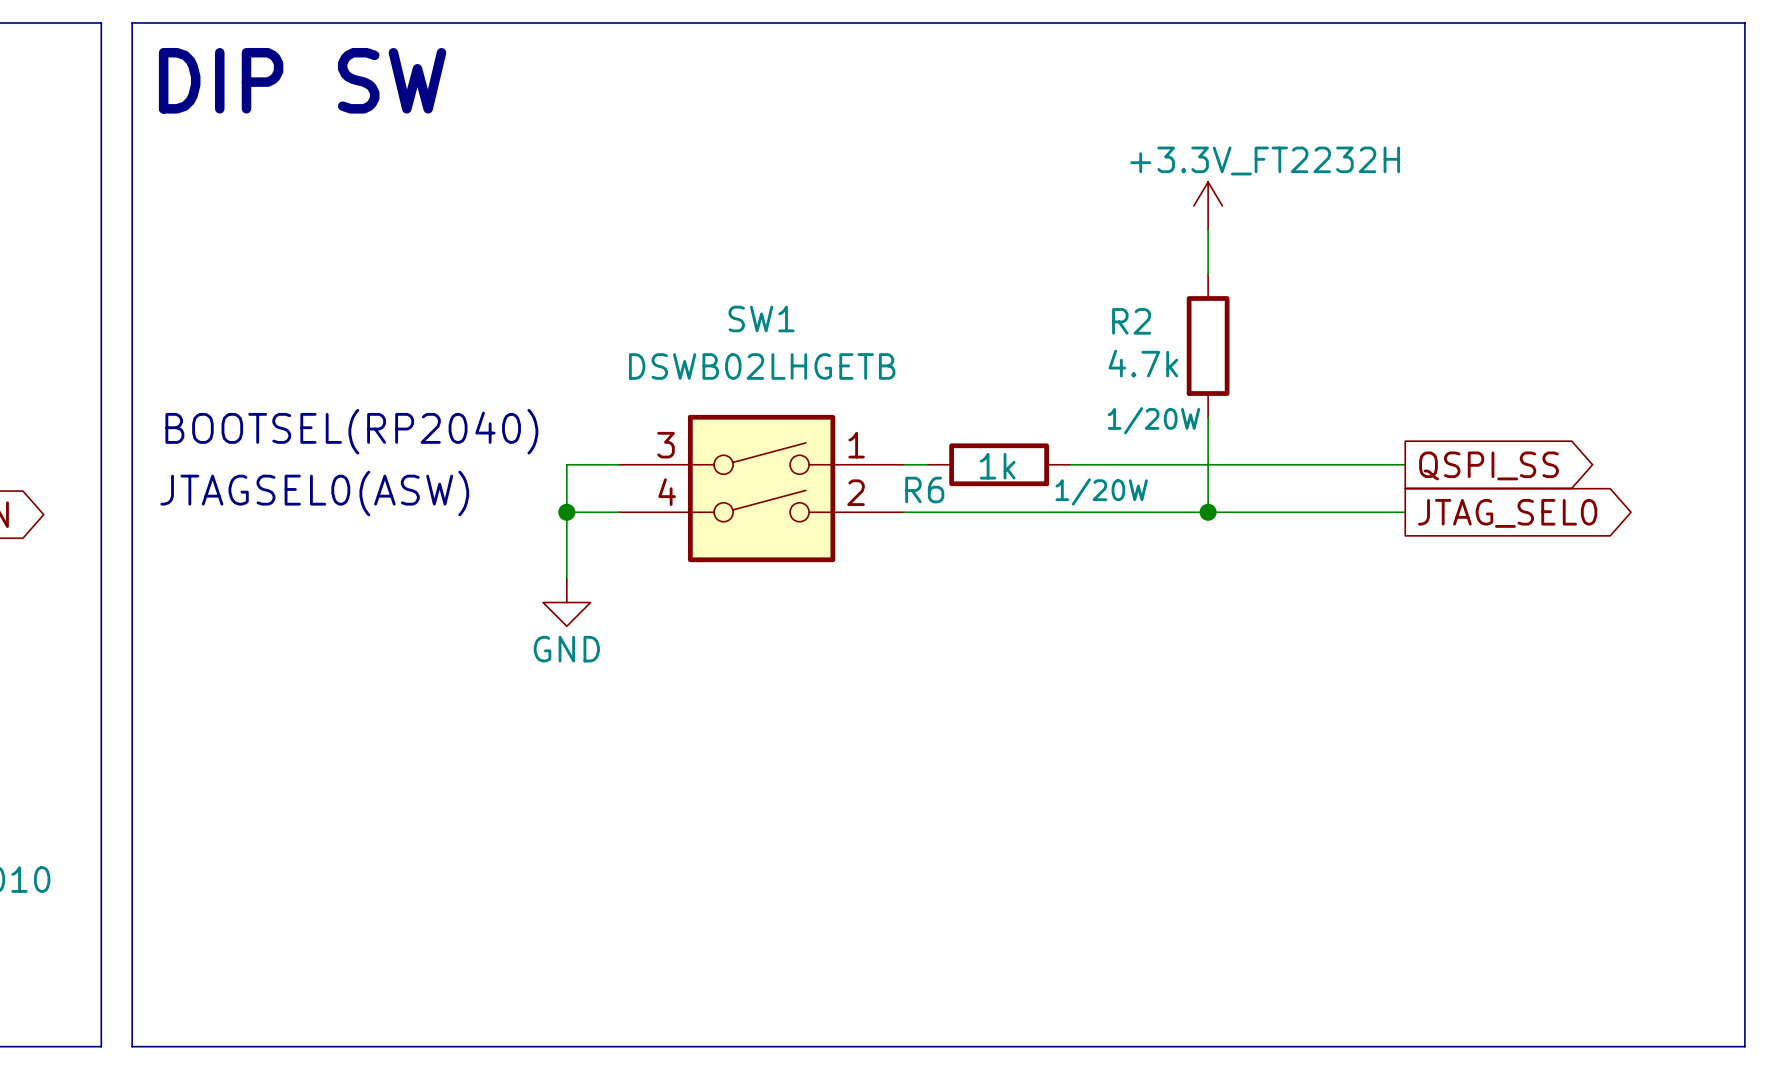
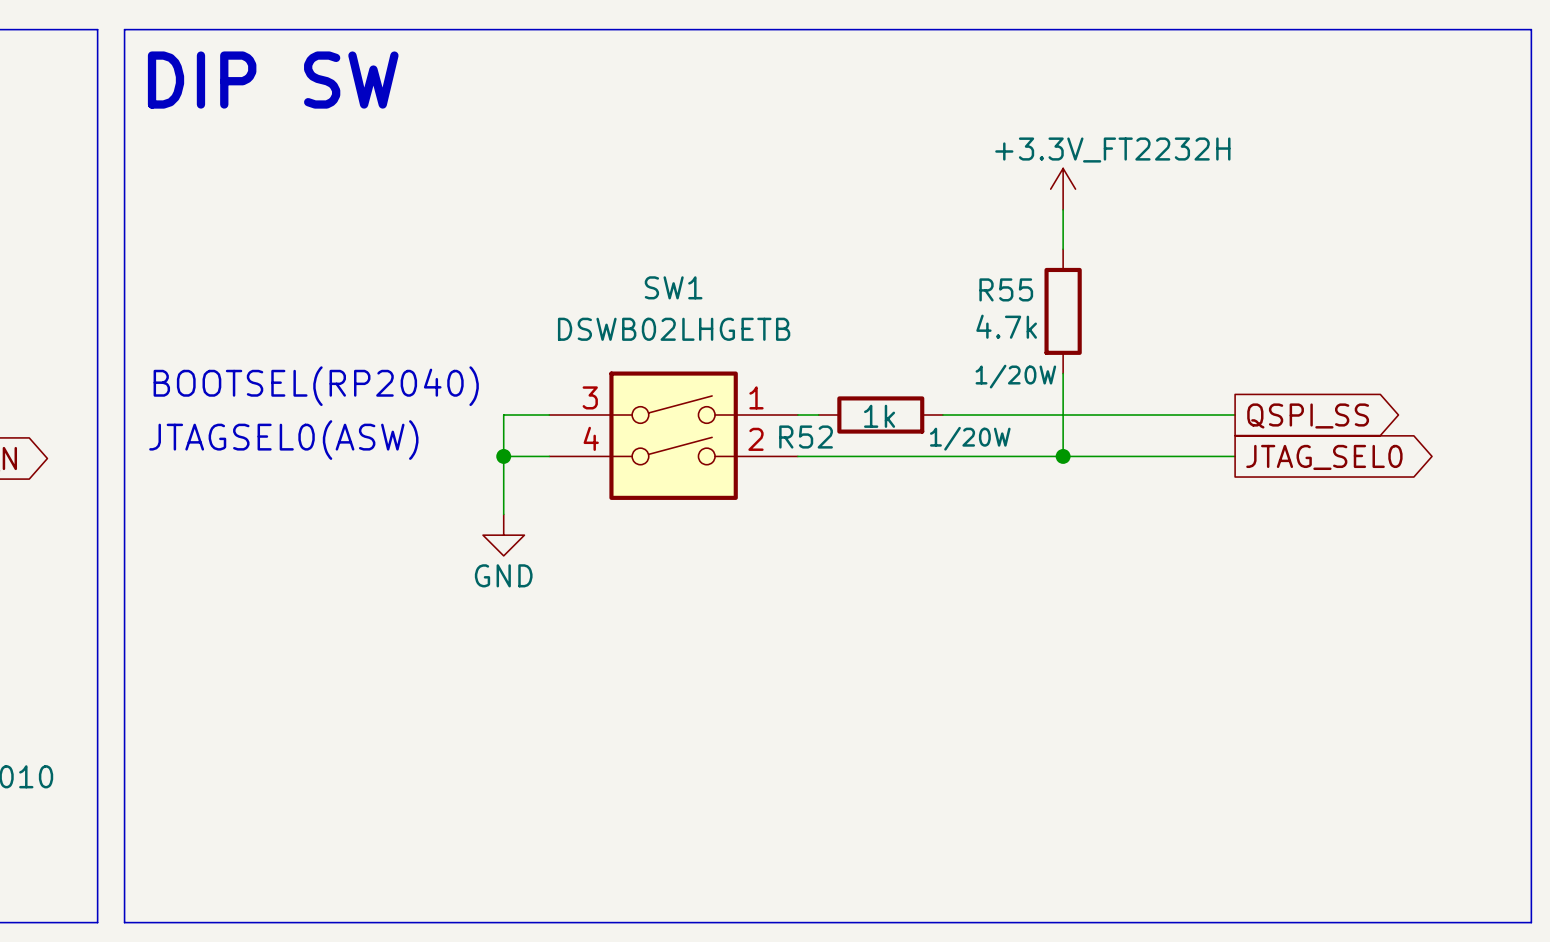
R2 name: R2 (1131, 321) -> R55 (1006, 289)
R6 name: R6 (924, 490) -> R52 (806, 437)

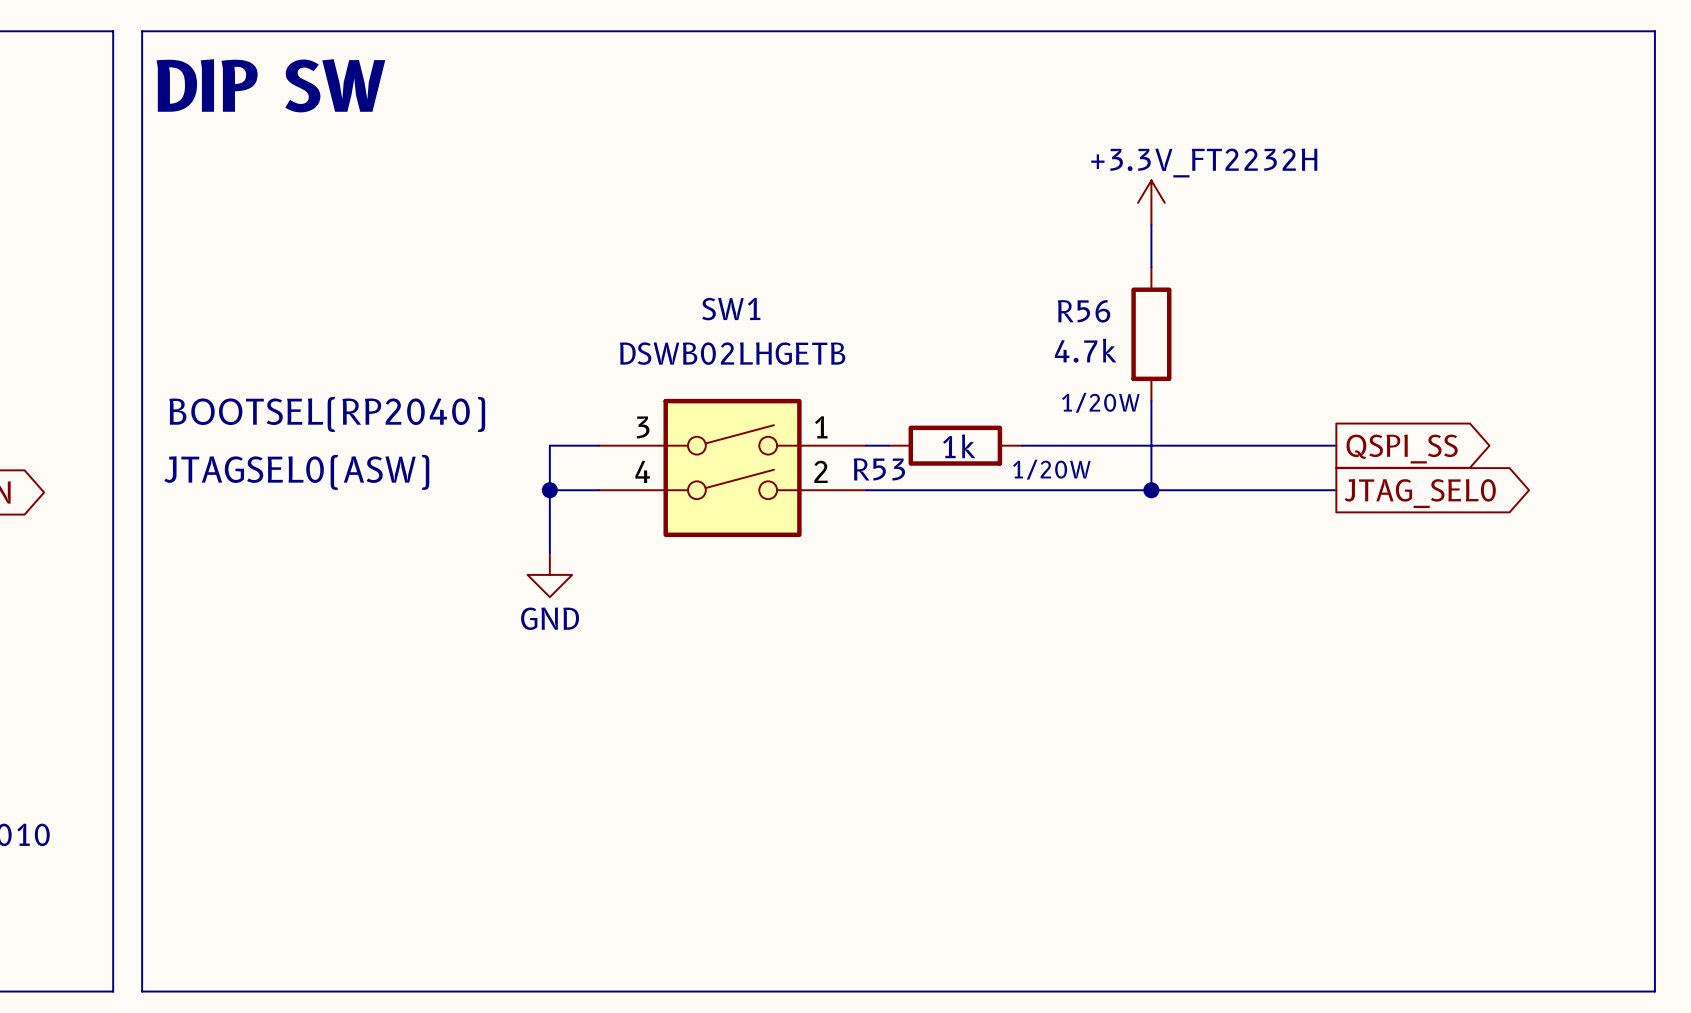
R55 name: R55 (1006, 289) -> R56 (1084, 311)
R52 name: R52 (806, 437) -> R53 (879, 469)

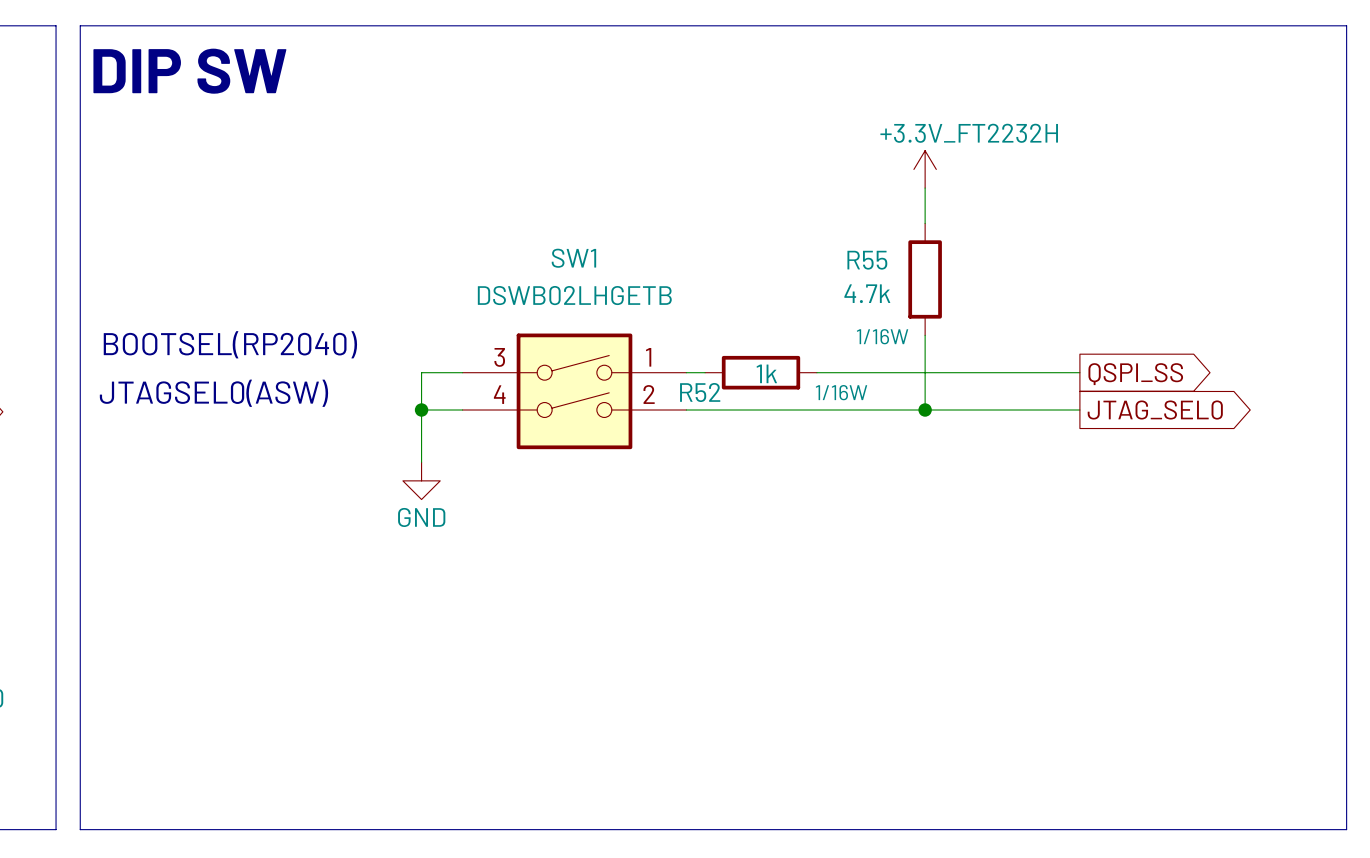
R56 name: R56 (1084, 311) -> R55 (867, 260)
R56 text: 1/20W (1100, 402) -> 1/16W (882, 336)
R53 name: R53 (879, 469) -> R52 (700, 392)
R53 text: 1/20W (1051, 469) -> 1/16W (841, 392)

